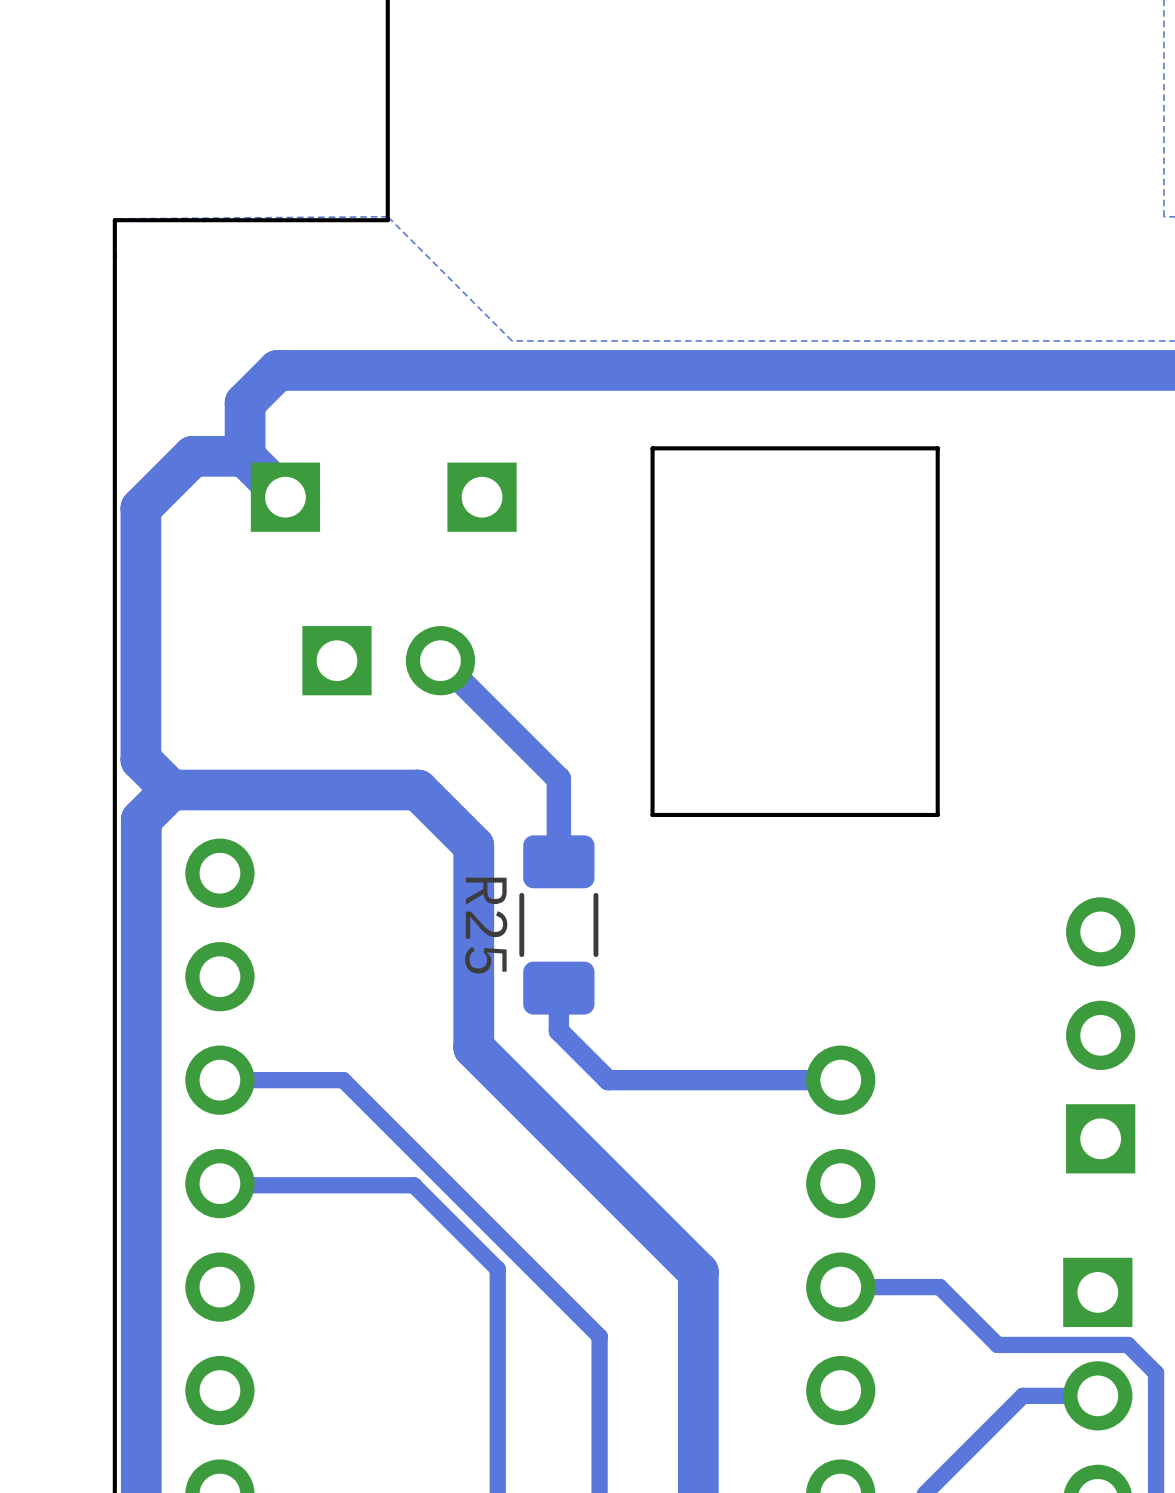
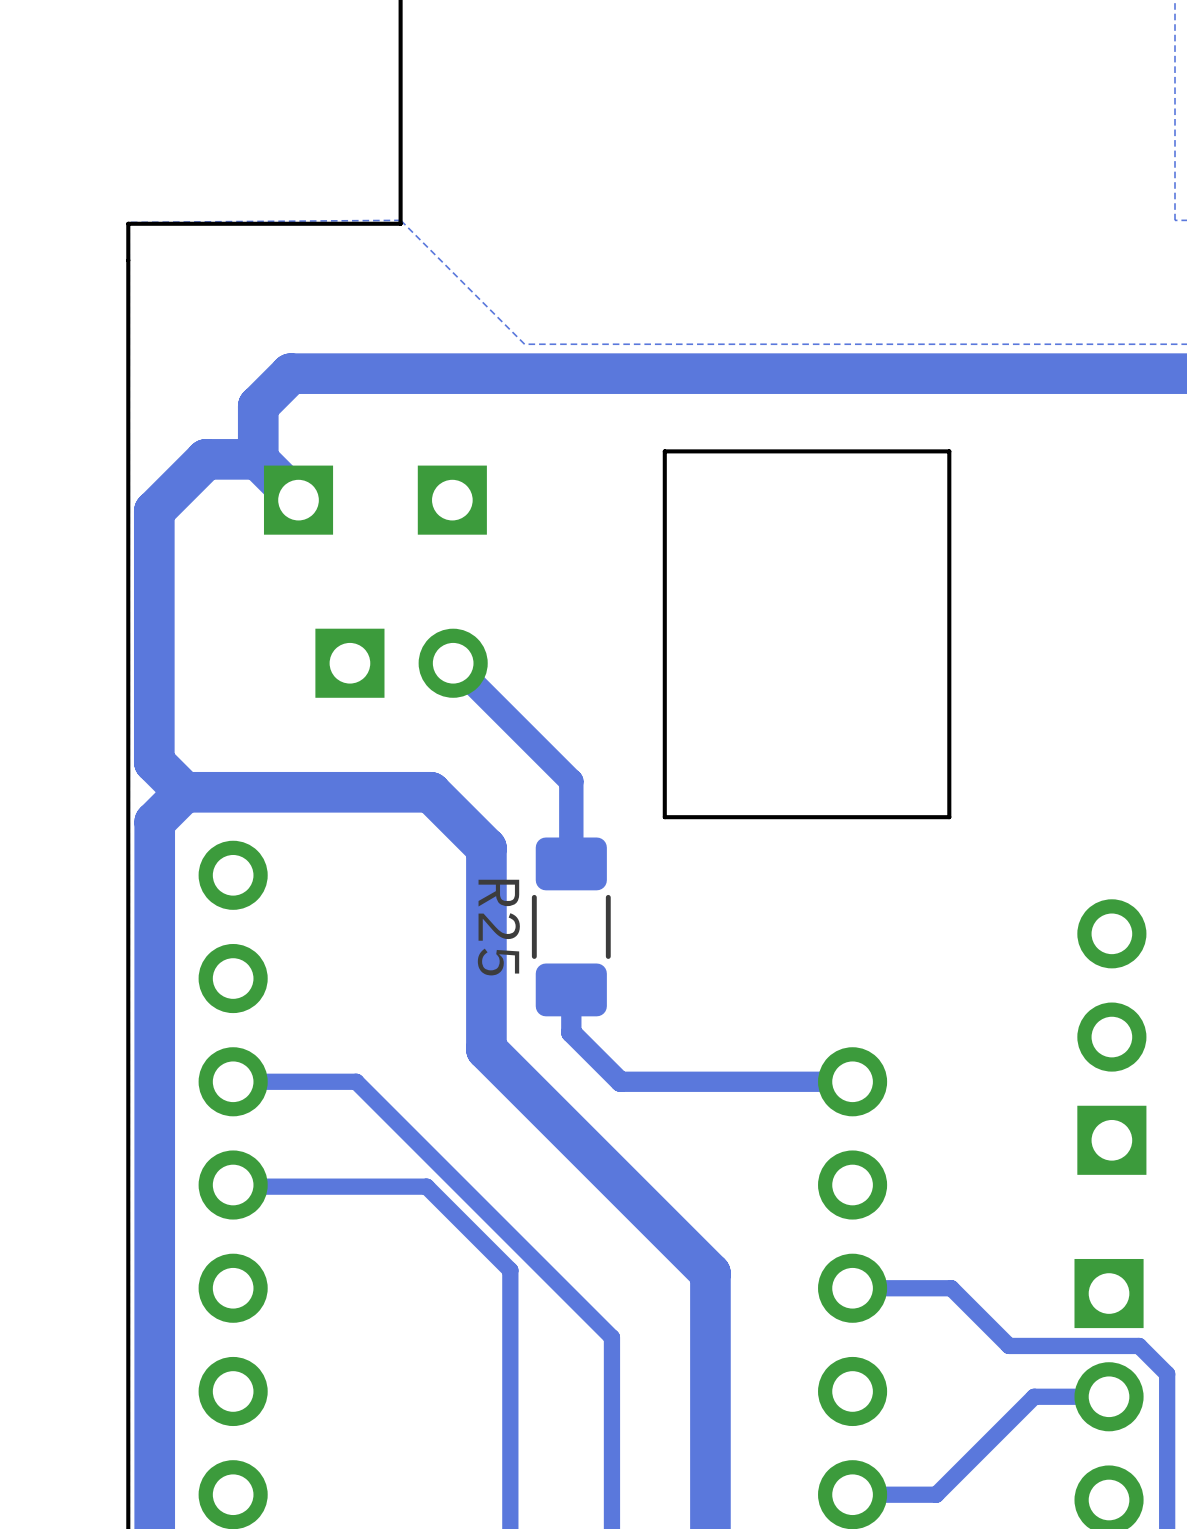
part position: (482, 497) -> (452, 500)

